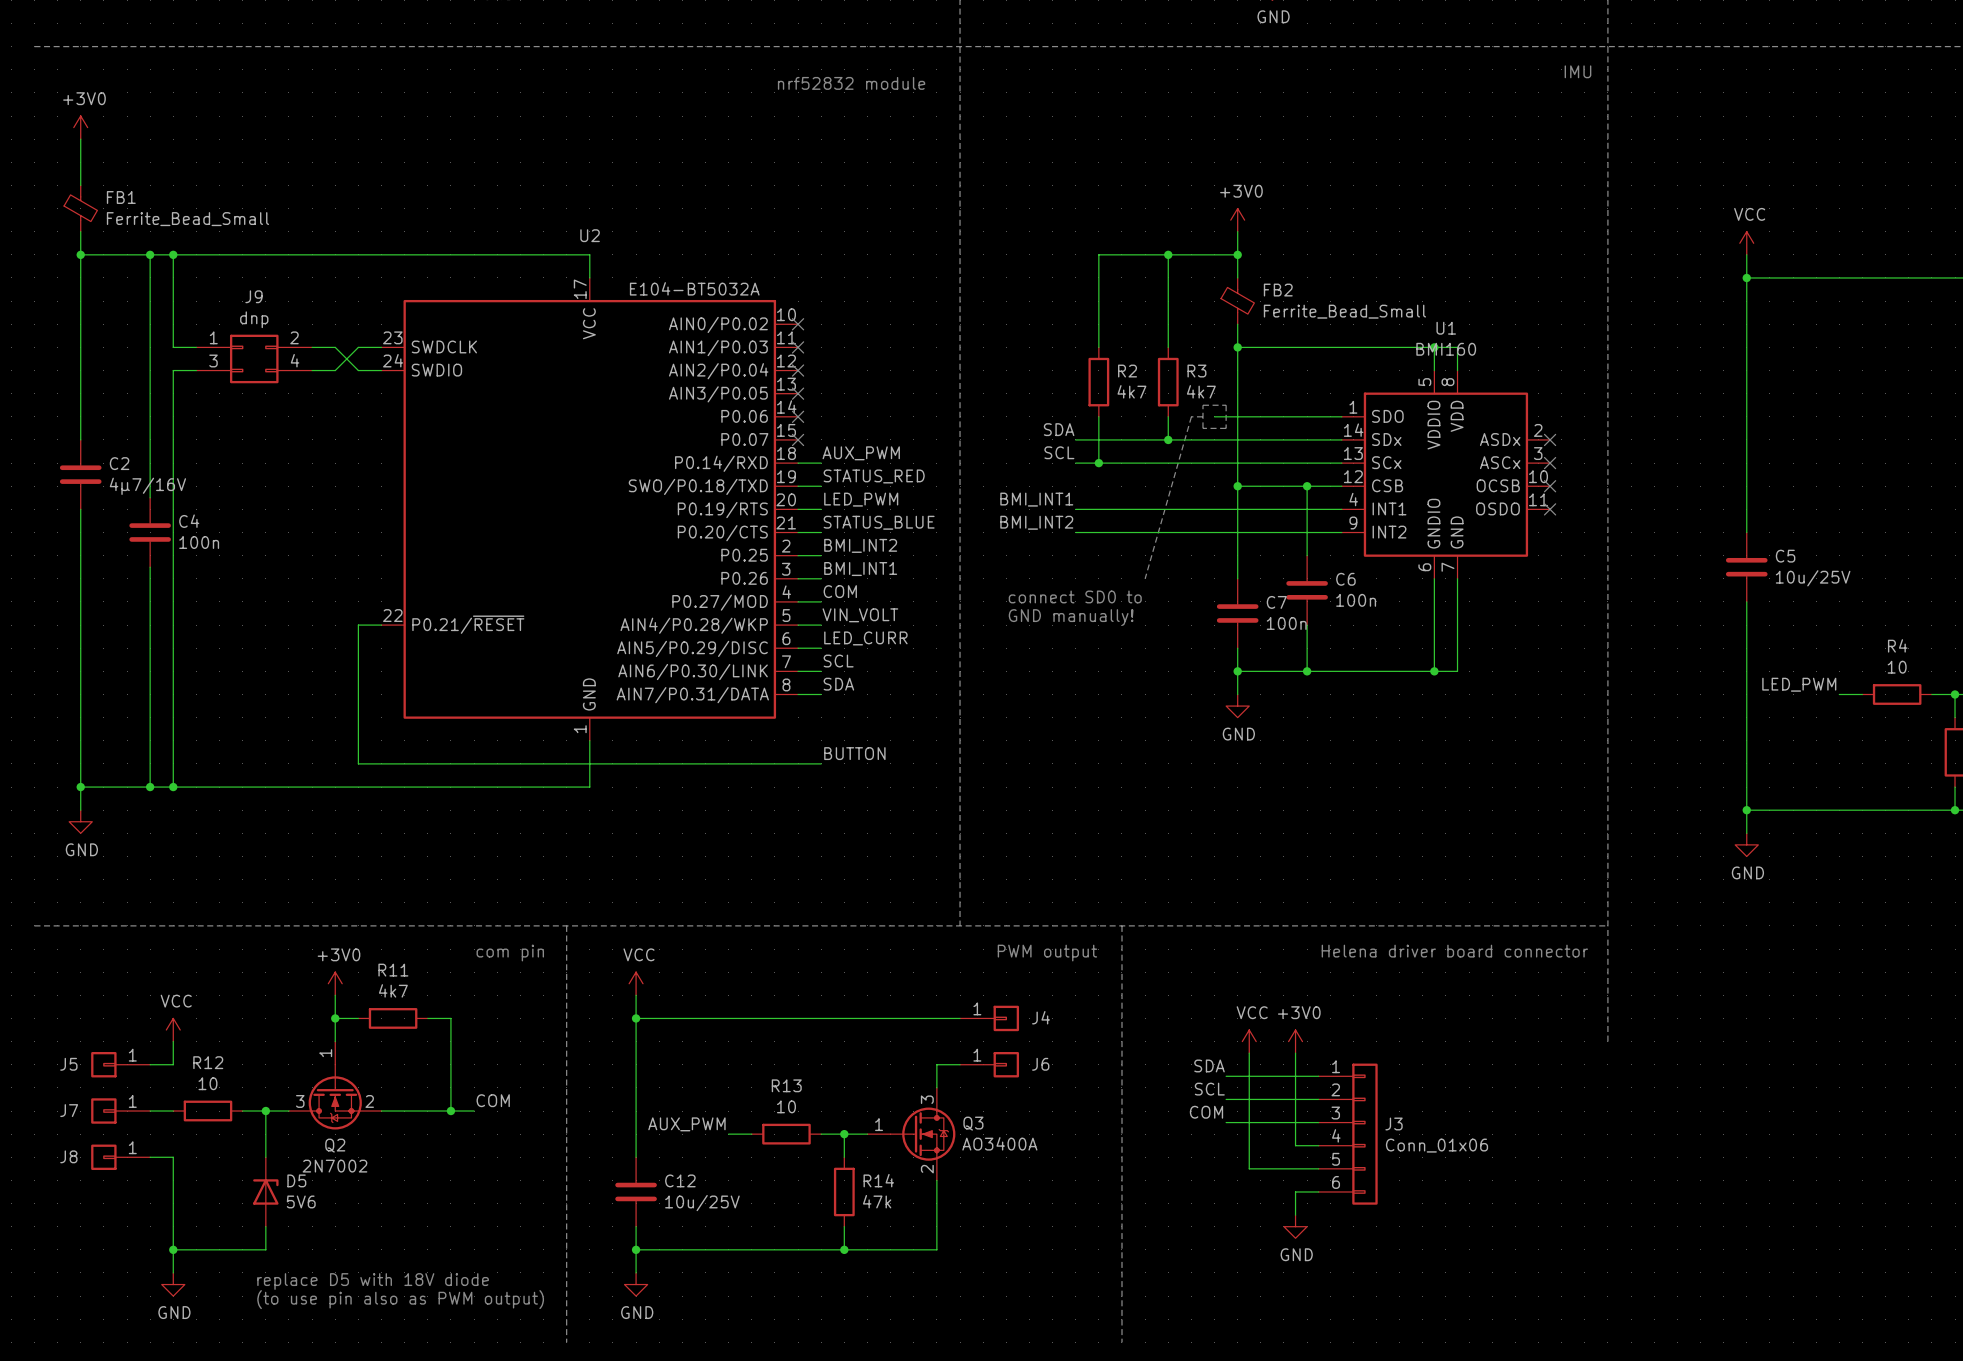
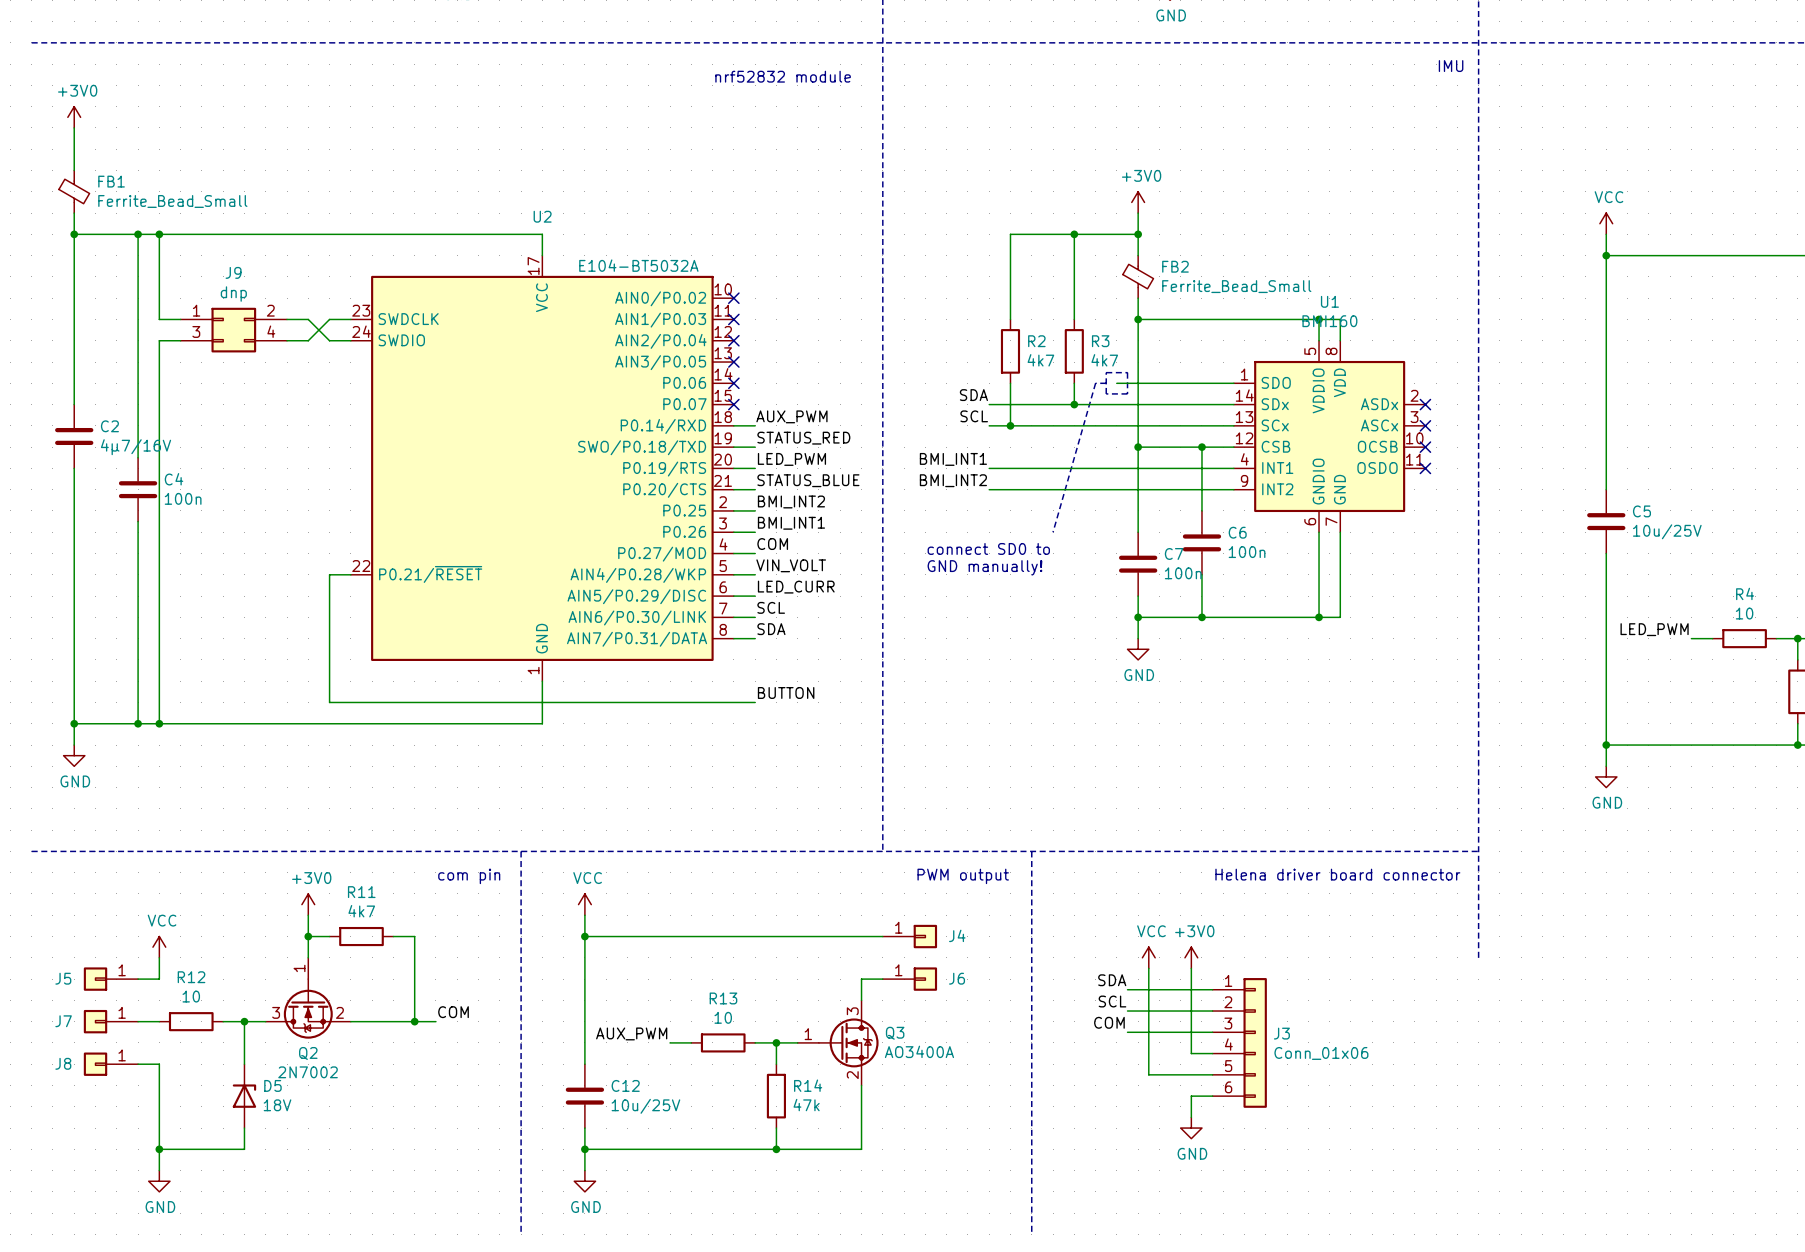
D5 value: 5V6 (301, 1201) -> 18V (277, 1105)
text: replace D5 with 18V diode (373, 1281) -> none
text: (to use pin also as PWM output) (400, 1299) -> none

